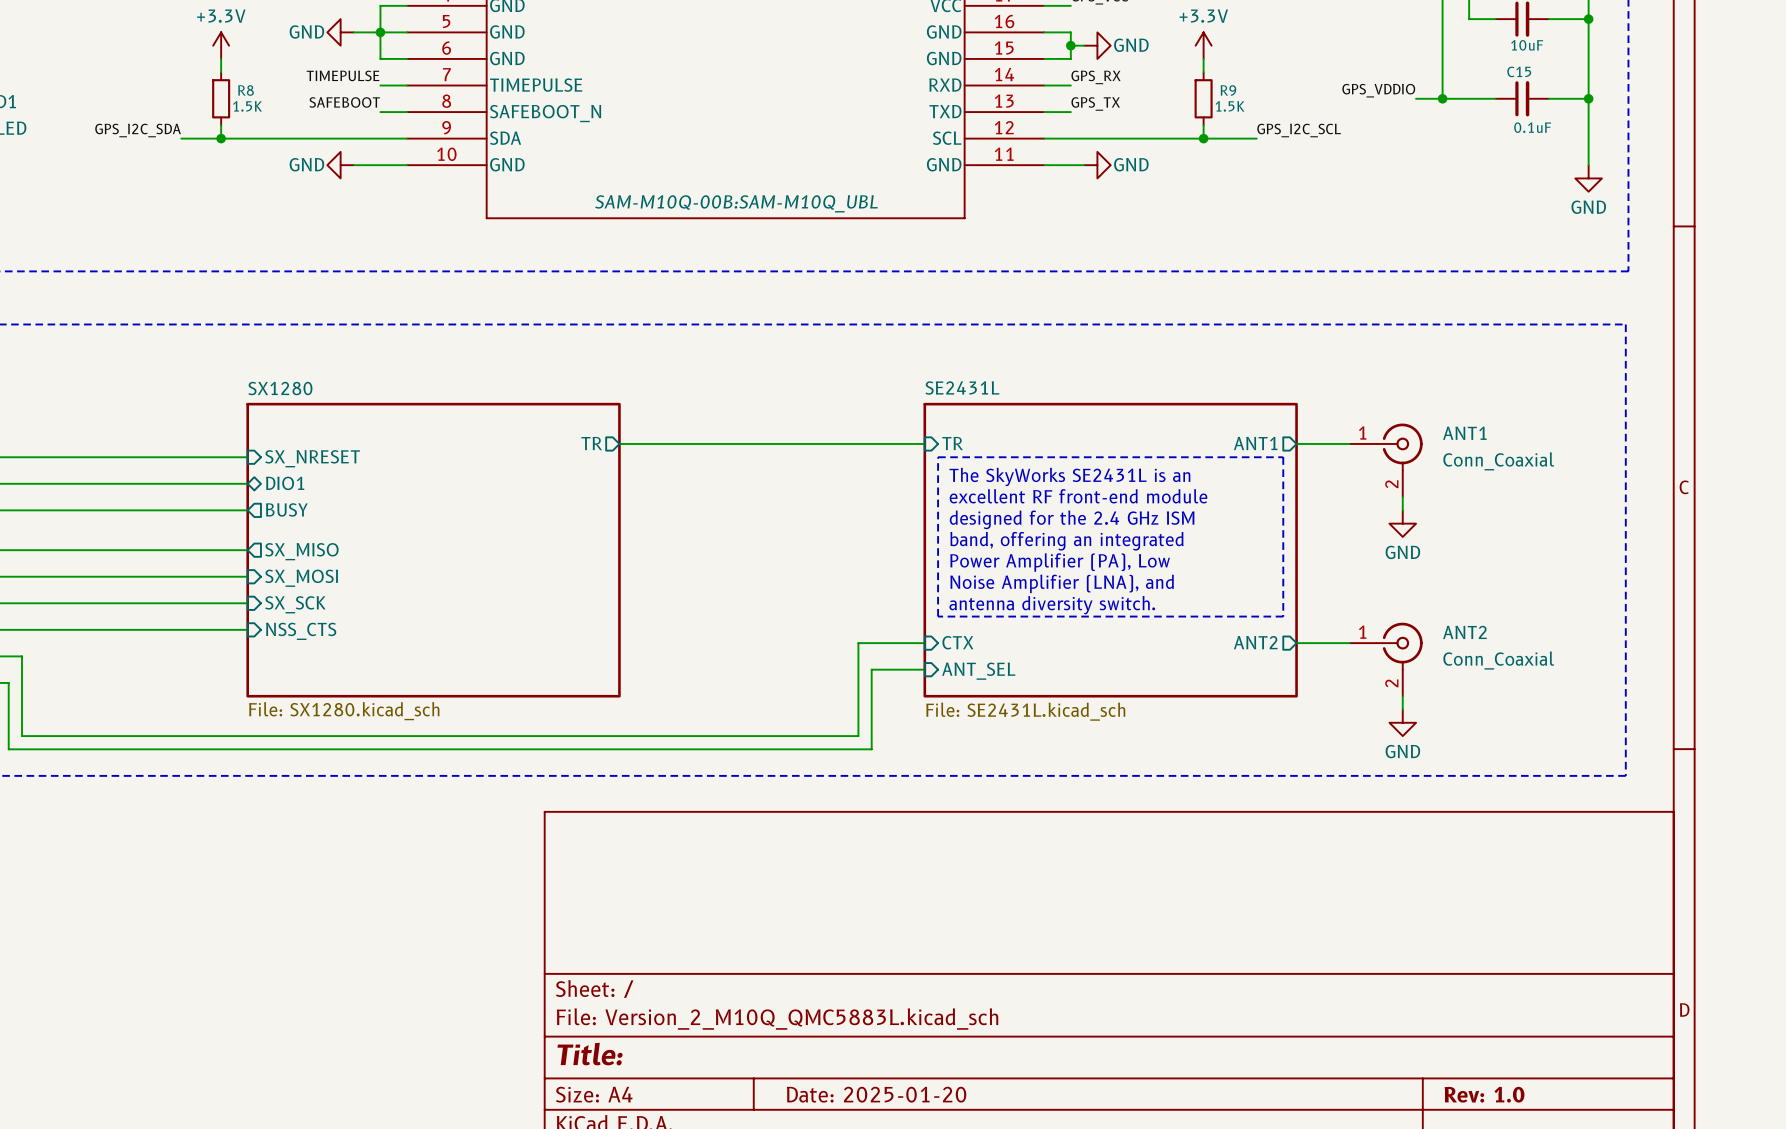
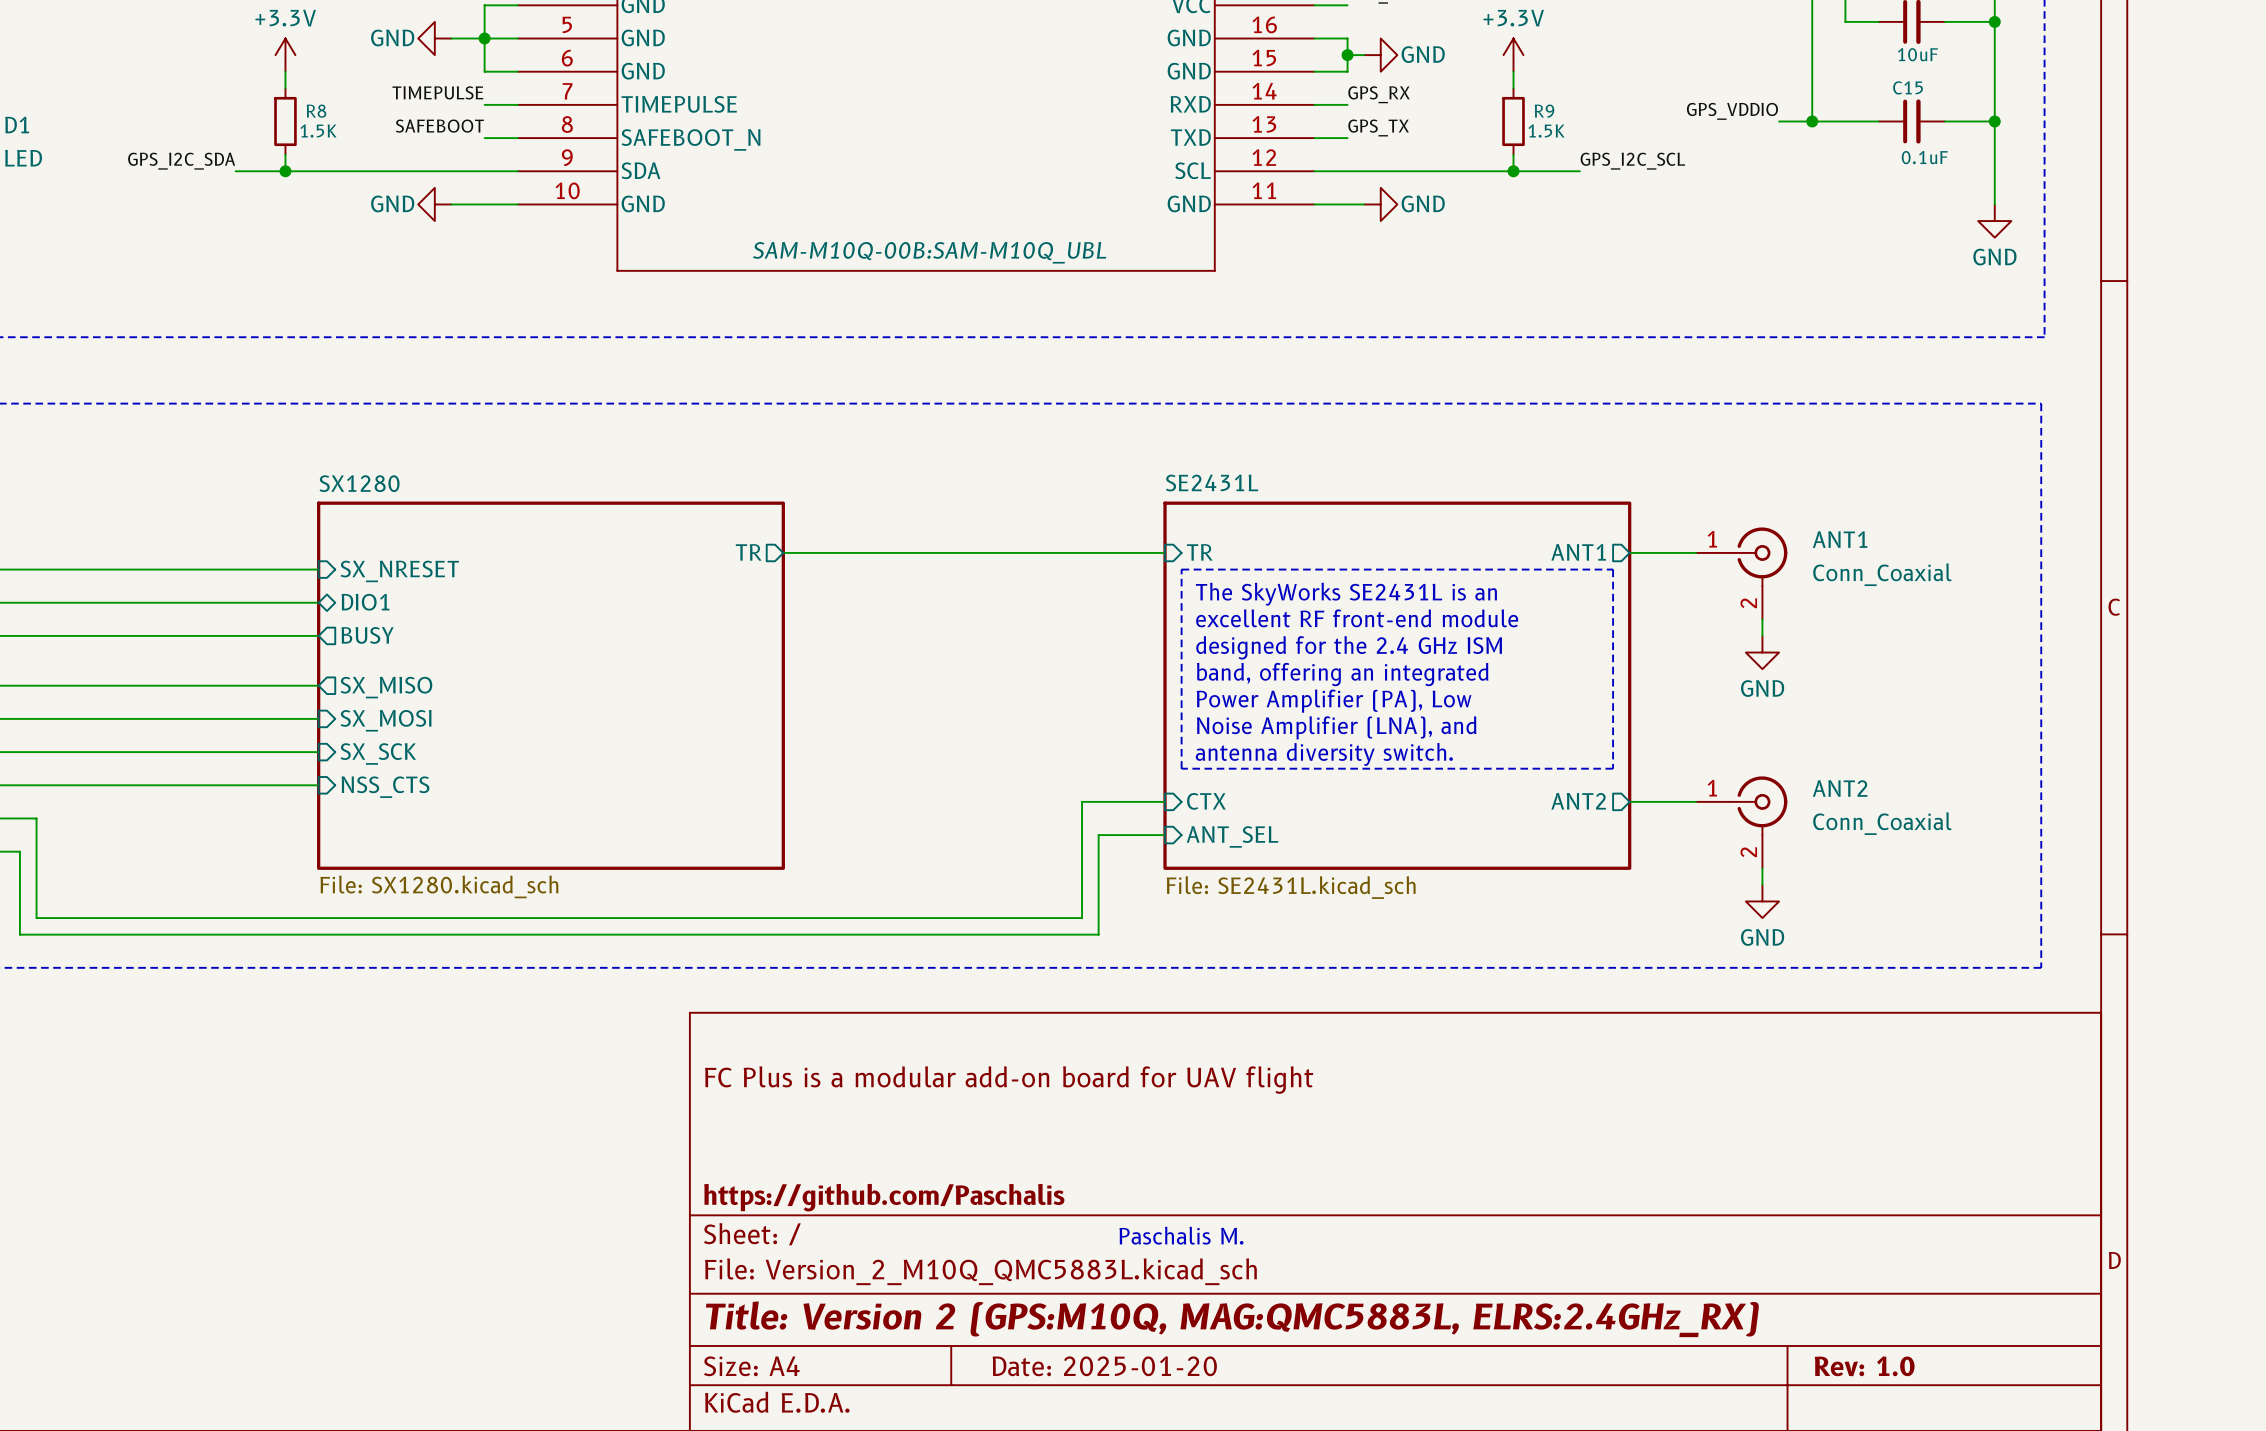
title block: none -> FC Plus is a modular add-on board for UAV flight (1009, 1080)
title block: none -> https://github.com/Paschalis (884, 1197)
text: none -> Paschalis M. (1181, 1235)
title block: Title: (590, 1054) -> Title: Version 2 (GPS:M10Q, MAG:QMC5883L, ELRS:2.4GHz_RX) (1232, 1319)

